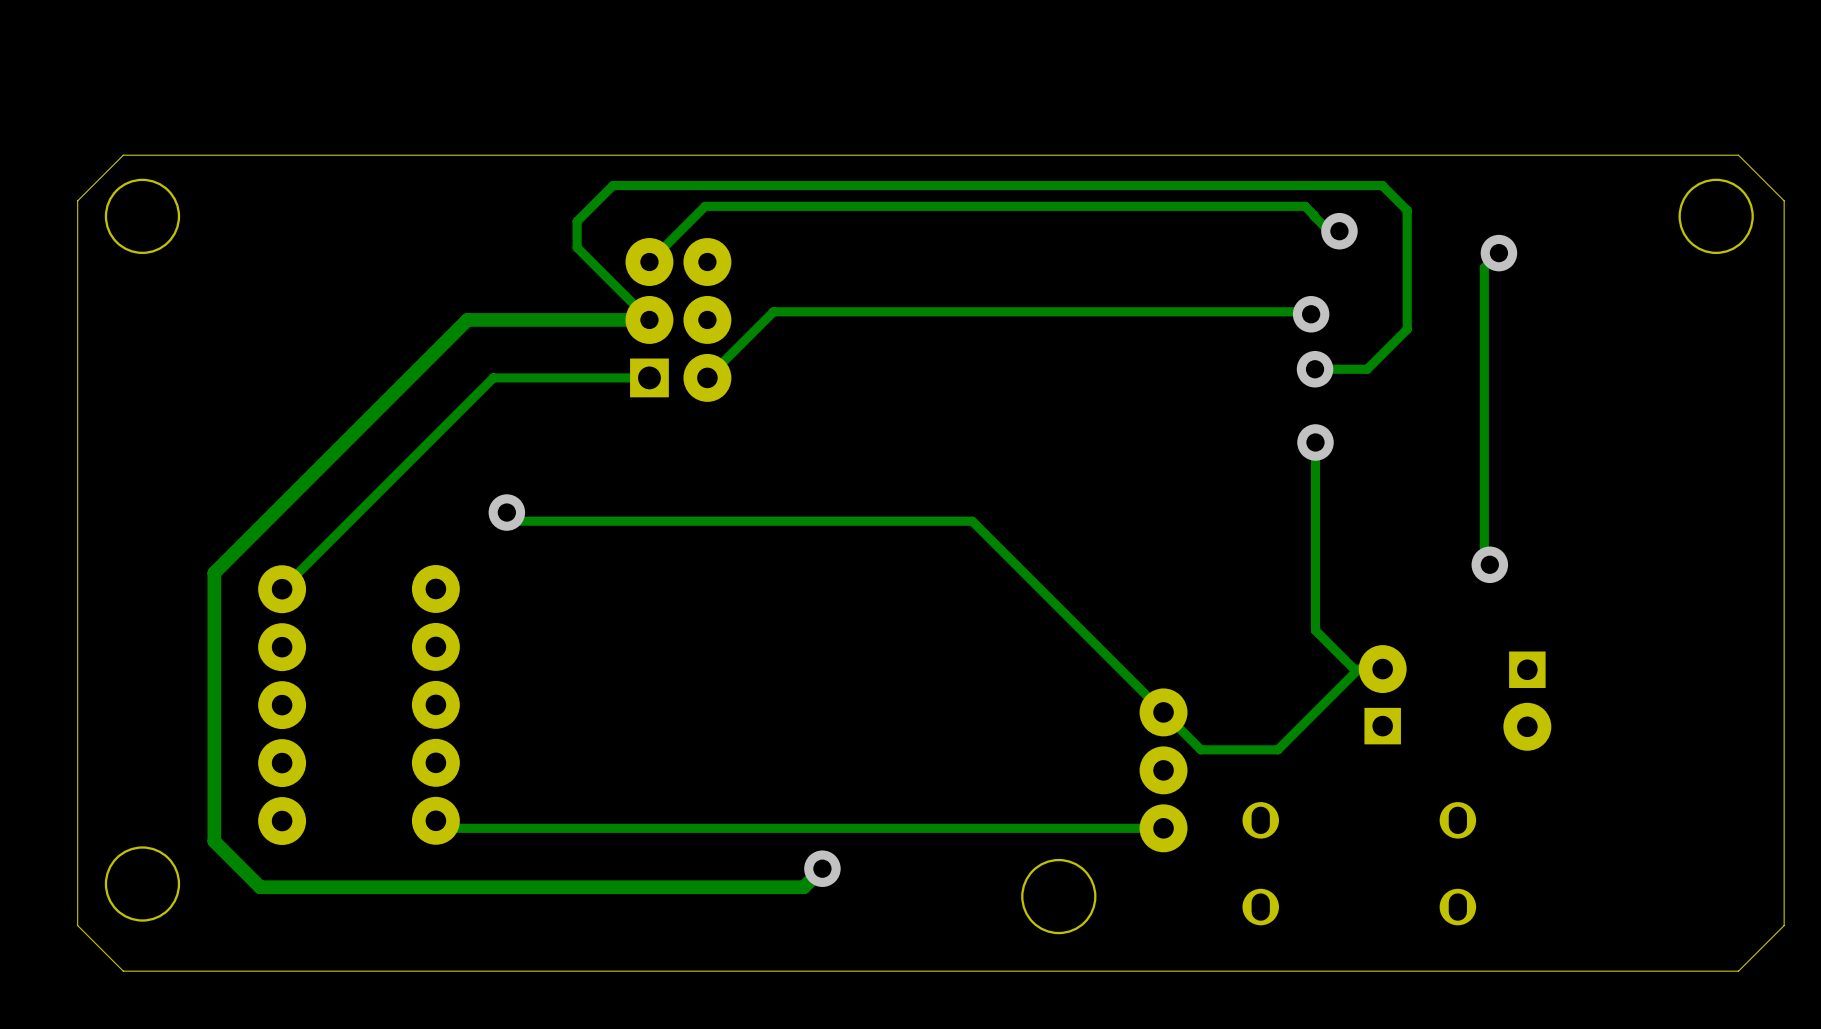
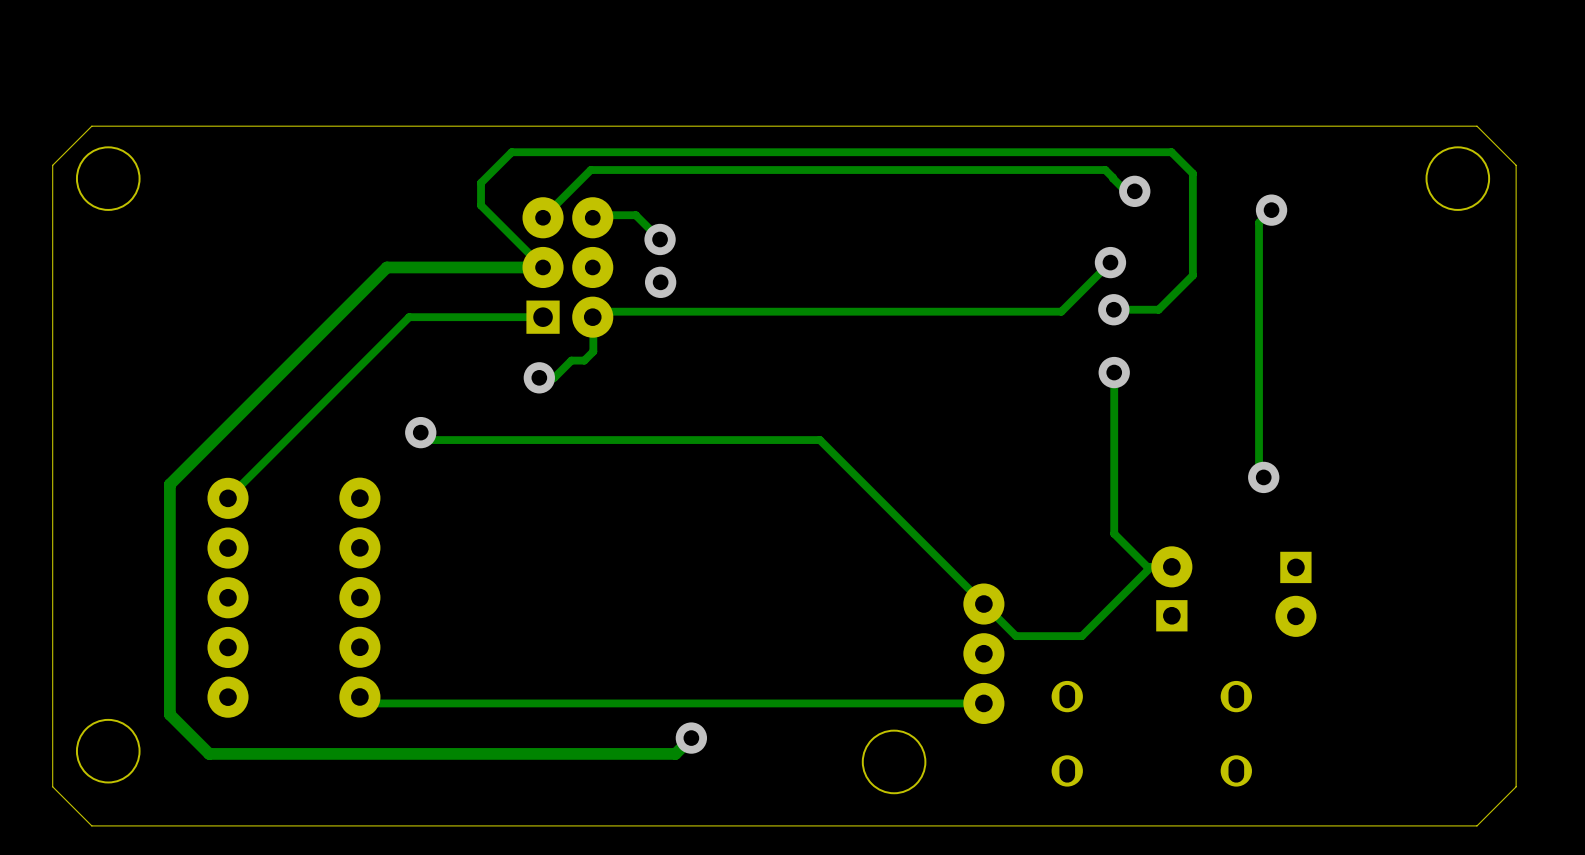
track: none -> (592, 217) (595, 215) (635, 215) (660, 239)
via: none -> (660, 239)
track: (1311, 314) (1308, 311) (773, 311) (713, 371) -> (1110, 262) (1061, 311) (598, 311)
via: none -> (660, 282)
track: none -> (592, 317) (593, 351) (584, 360) (571, 360) (554, 377) (539, 377)
via: none -> (539, 377)

